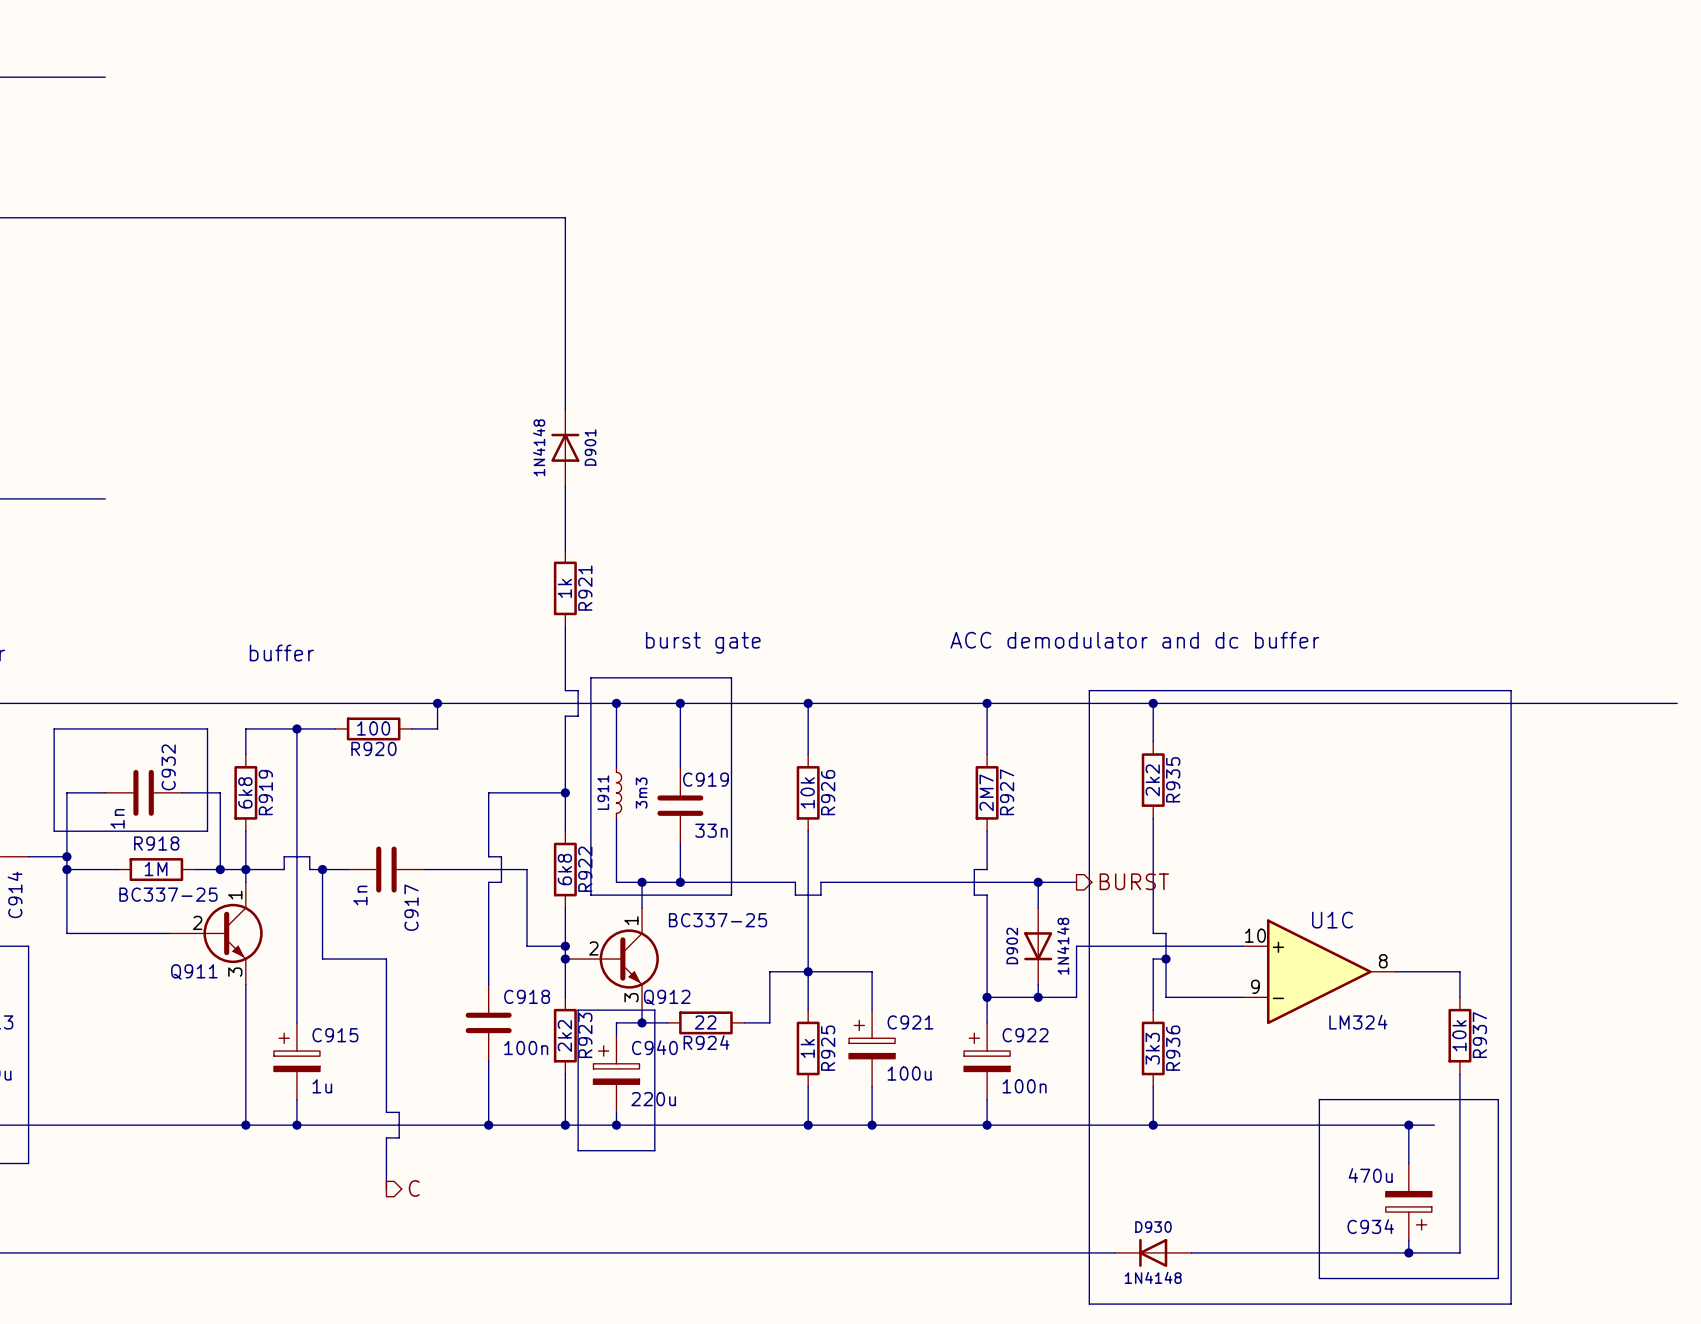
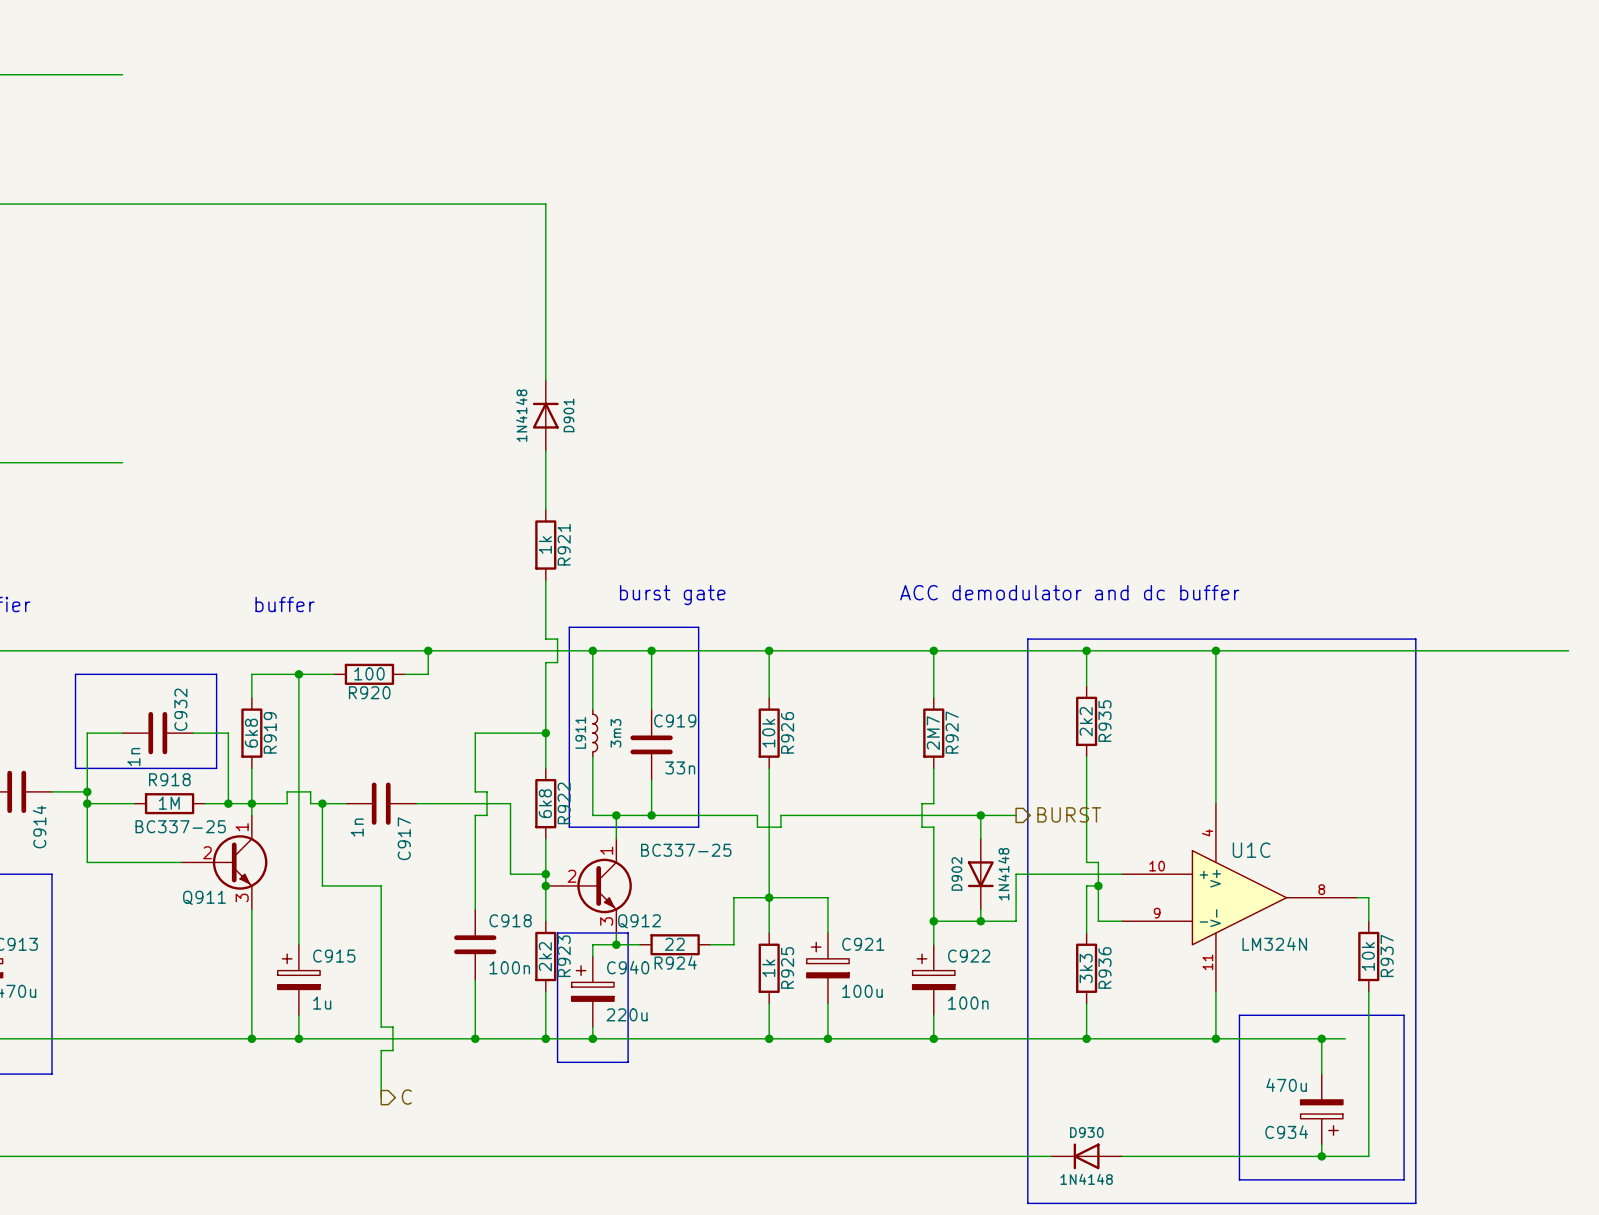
wire: none -> (1215, 650) (1215, 803)
junction: none -> (1215, 650)
U1C symbol: [1242, 919, 1397, 1025] -> [1121, 803, 1358, 992]
U1C value: LM324 (1358, 1022) -> LM324N (1274, 944)
wire: none -> (1215, 991) (1215, 1038)
junction: none -> (1215, 1038)

